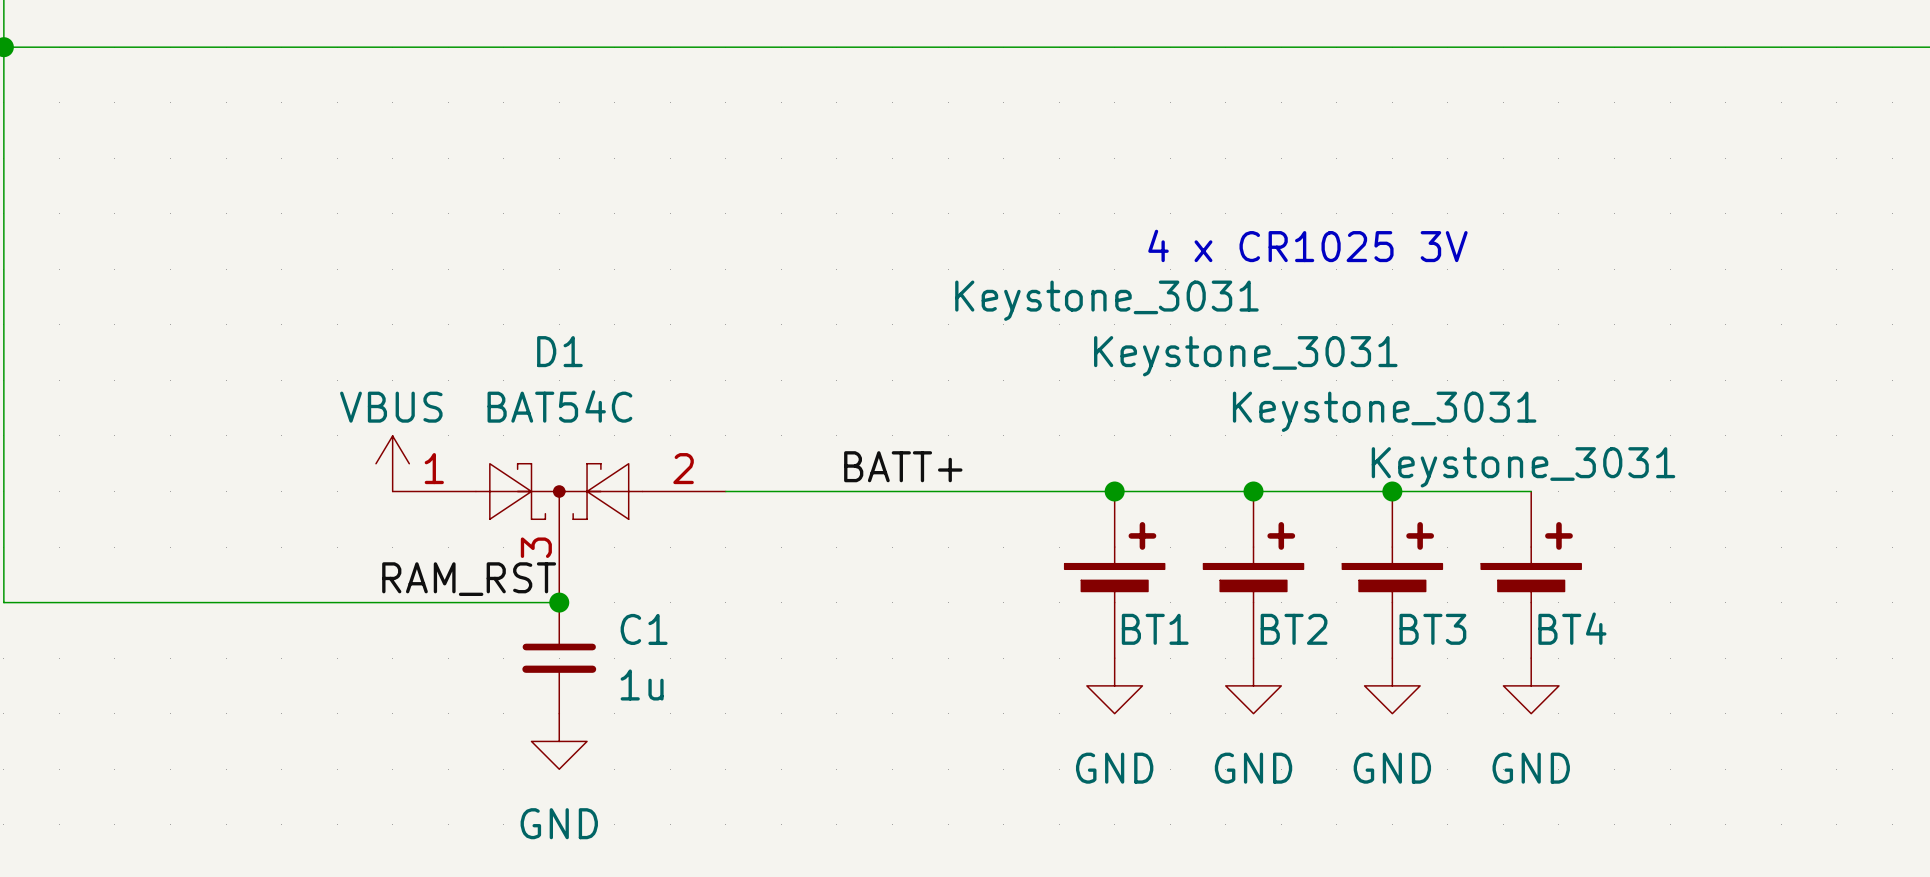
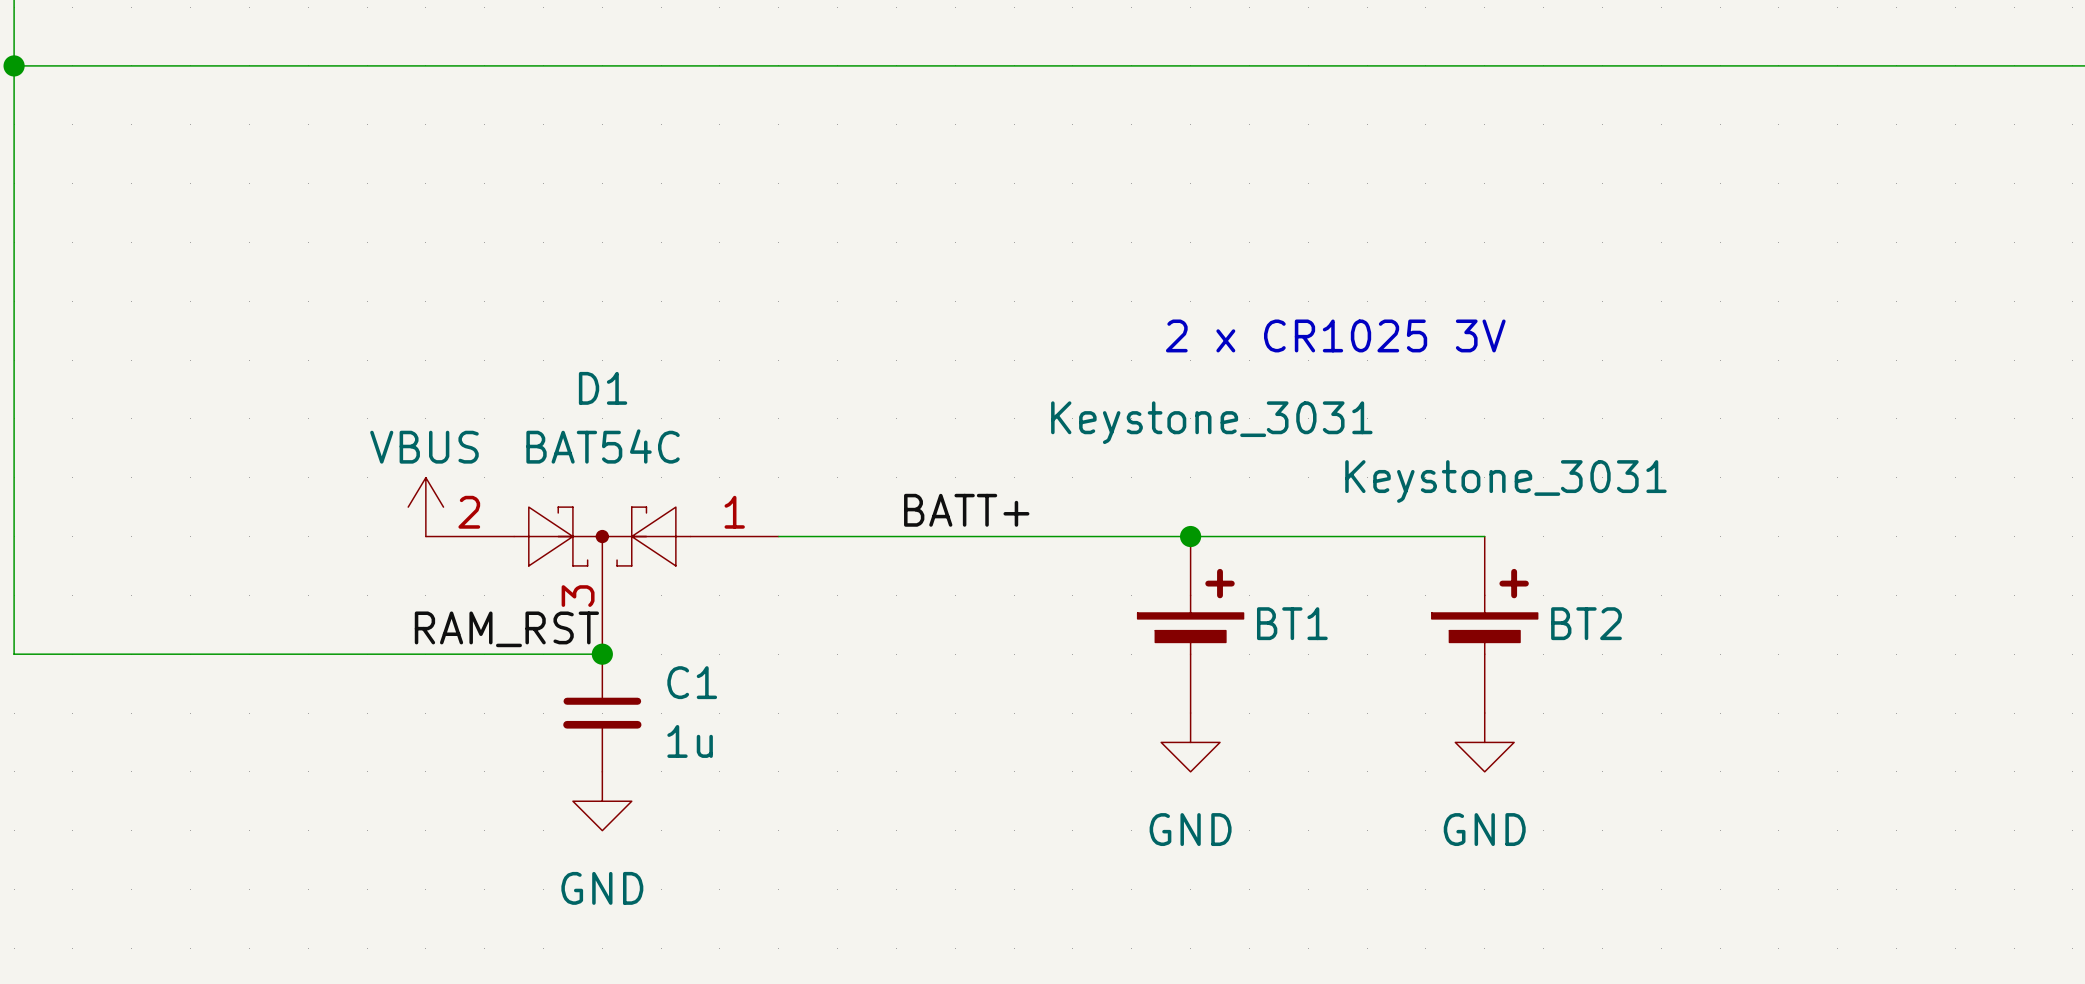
text: 4 x CR1025 3V (1307, 245) -> 2 x CR1025 3V (1335, 335)
BT1 value position: Keystone_3031 (1106, 300) -> Keystone_3031 (1211, 422)
BT3 value position: Keystone_3031 (1384, 411) -> Keystone_3031 (1505, 481)
D1 flip: as is (559, 491) -> left-right (602, 536)
junction: (1253, 491) -> none
wire: (1392, 491) (1531, 491) -> none
junction: (1392, 491) -> none
BT2: Keystone_3031 (1253, 574) -> none
BT4: Keystone_3031 (1531, 574) -> none
BT1 name position: BT1 (1155, 629) -> BT1 (1292, 623)
BT3 name: BT3 (1432, 629) -> BT2 (1586, 623)
power symbol: GND (1253, 685) -> none
power symbol: GND (1531, 685) -> none

